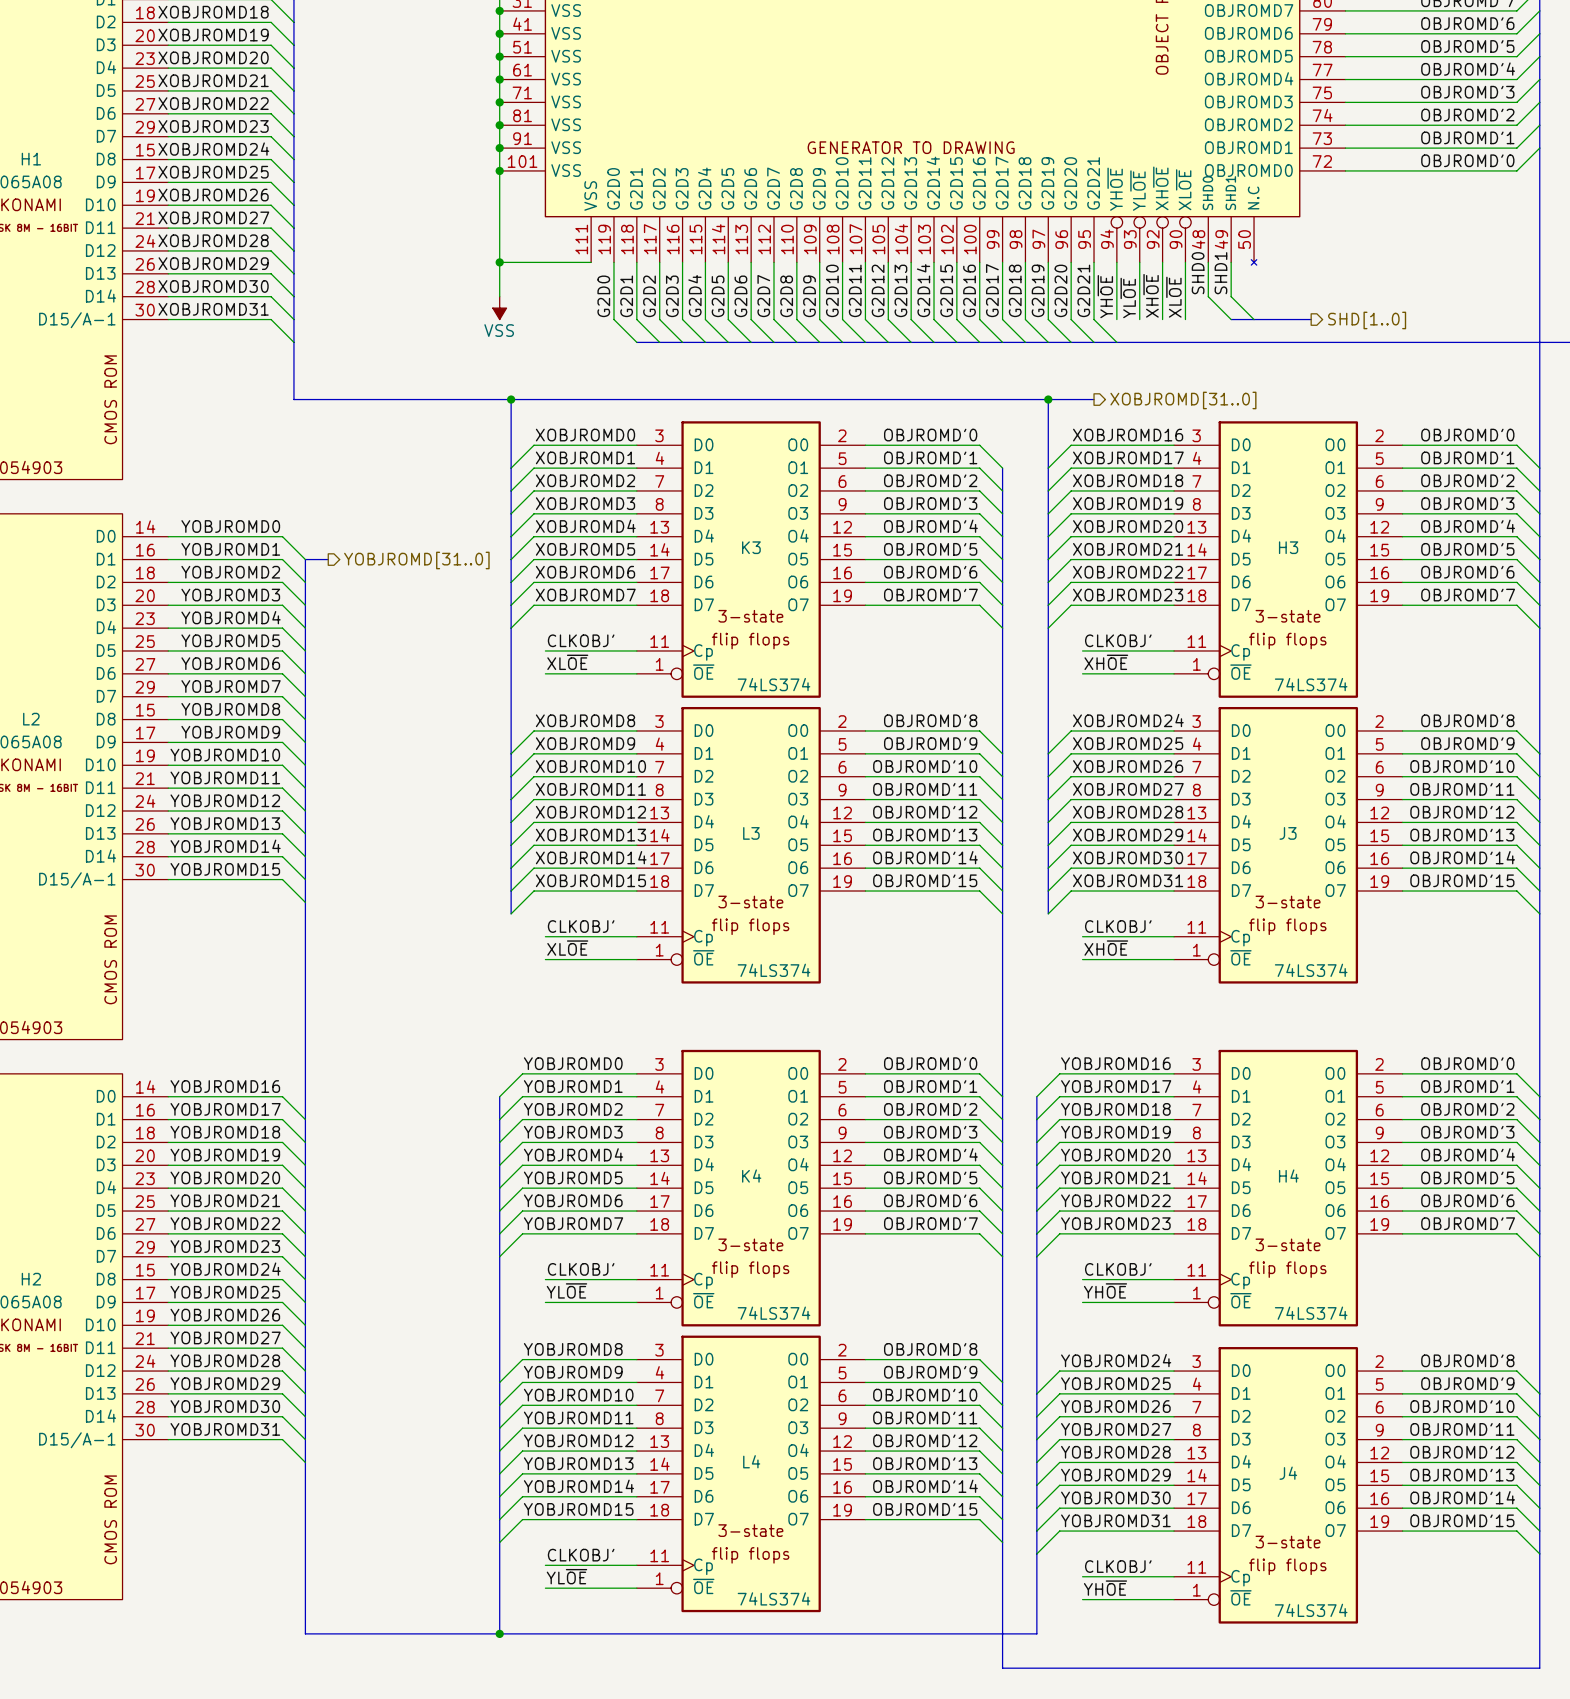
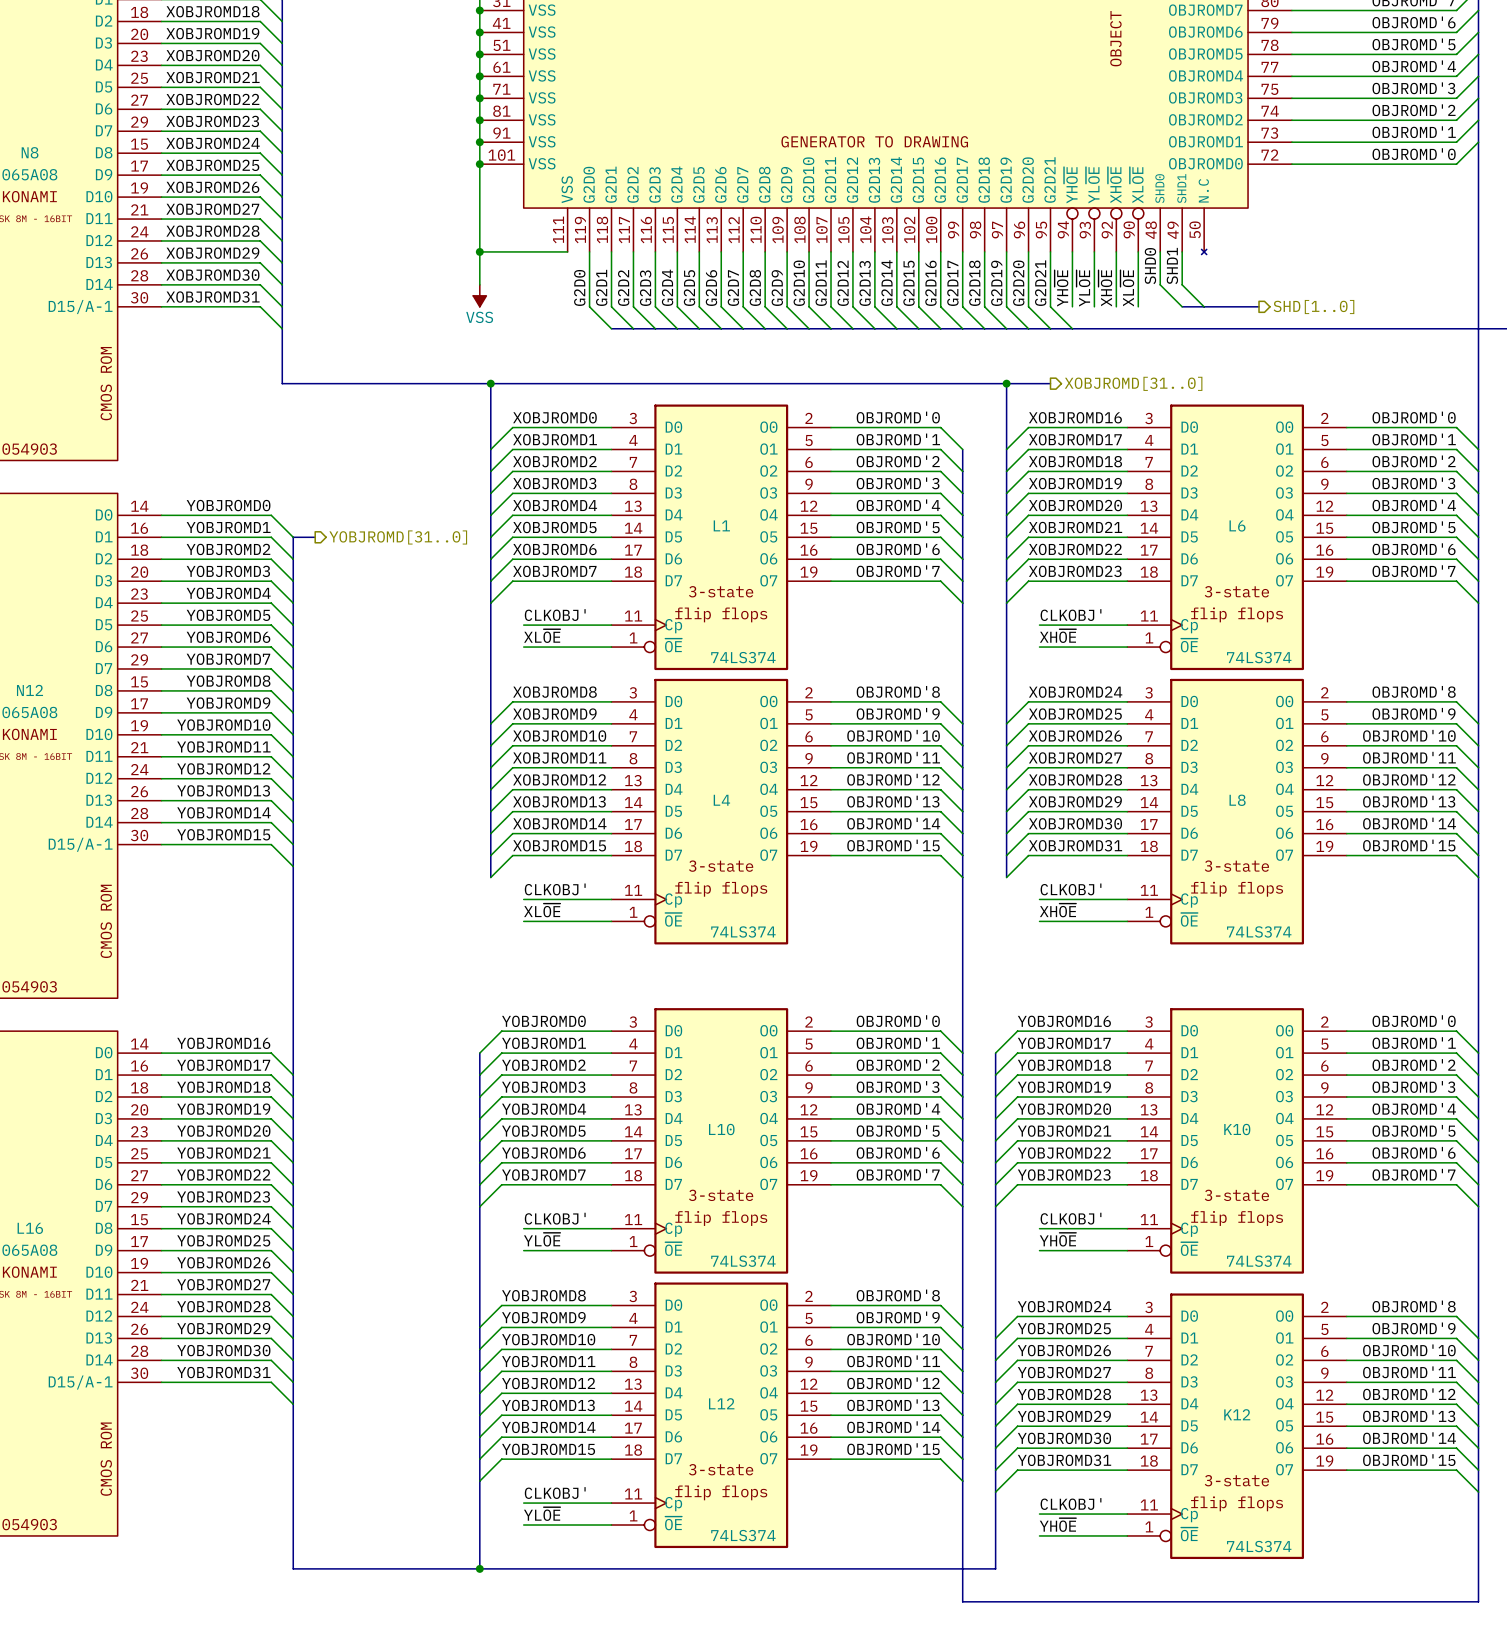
H1 name: H1 (31, 159) -> N8 (30, 152)
K3 name: K3 (751, 547) -> L1 (721, 525)
H3 name: H3 (1288, 547) -> L6 (1237, 526)
L2 name: L2 (31, 719) -> N12 (29, 690)
L3 name: L3 (751, 833) -> L4 (721, 800)
J3 name: J3 (1288, 833) -> L8 (1237, 800)
K4 name: K4 (751, 1176) -> L10 (721, 1129)
H4 name: H4 (1288, 1176) -> K10 (1237, 1129)
H2 name: H2 (31, 1279) -> L16 (30, 1228)
L4 name: L4 (751, 1461) -> L12 (721, 1403)
J4 name: J4 (1288, 1473) -> K12 (1237, 1414)

